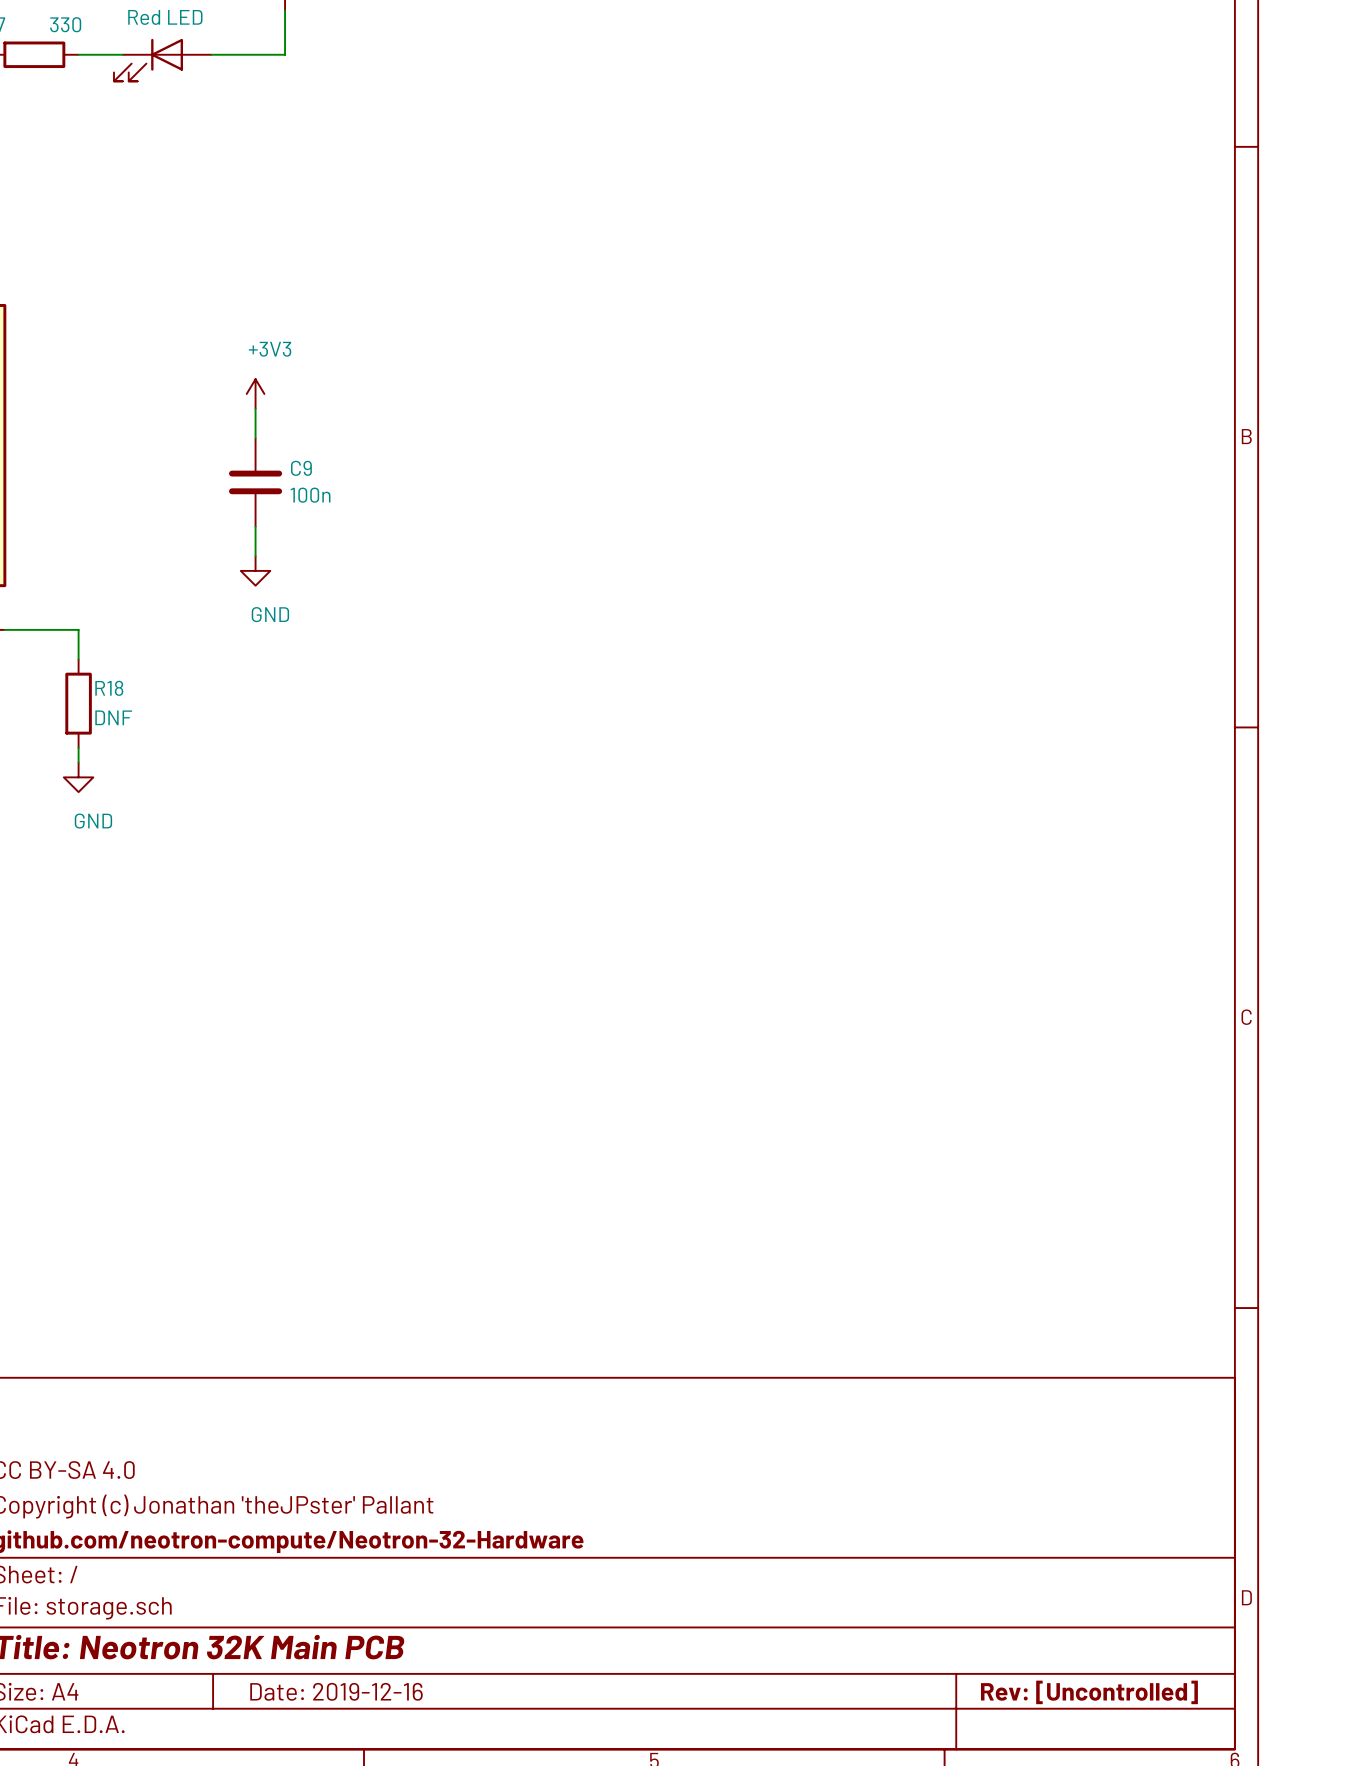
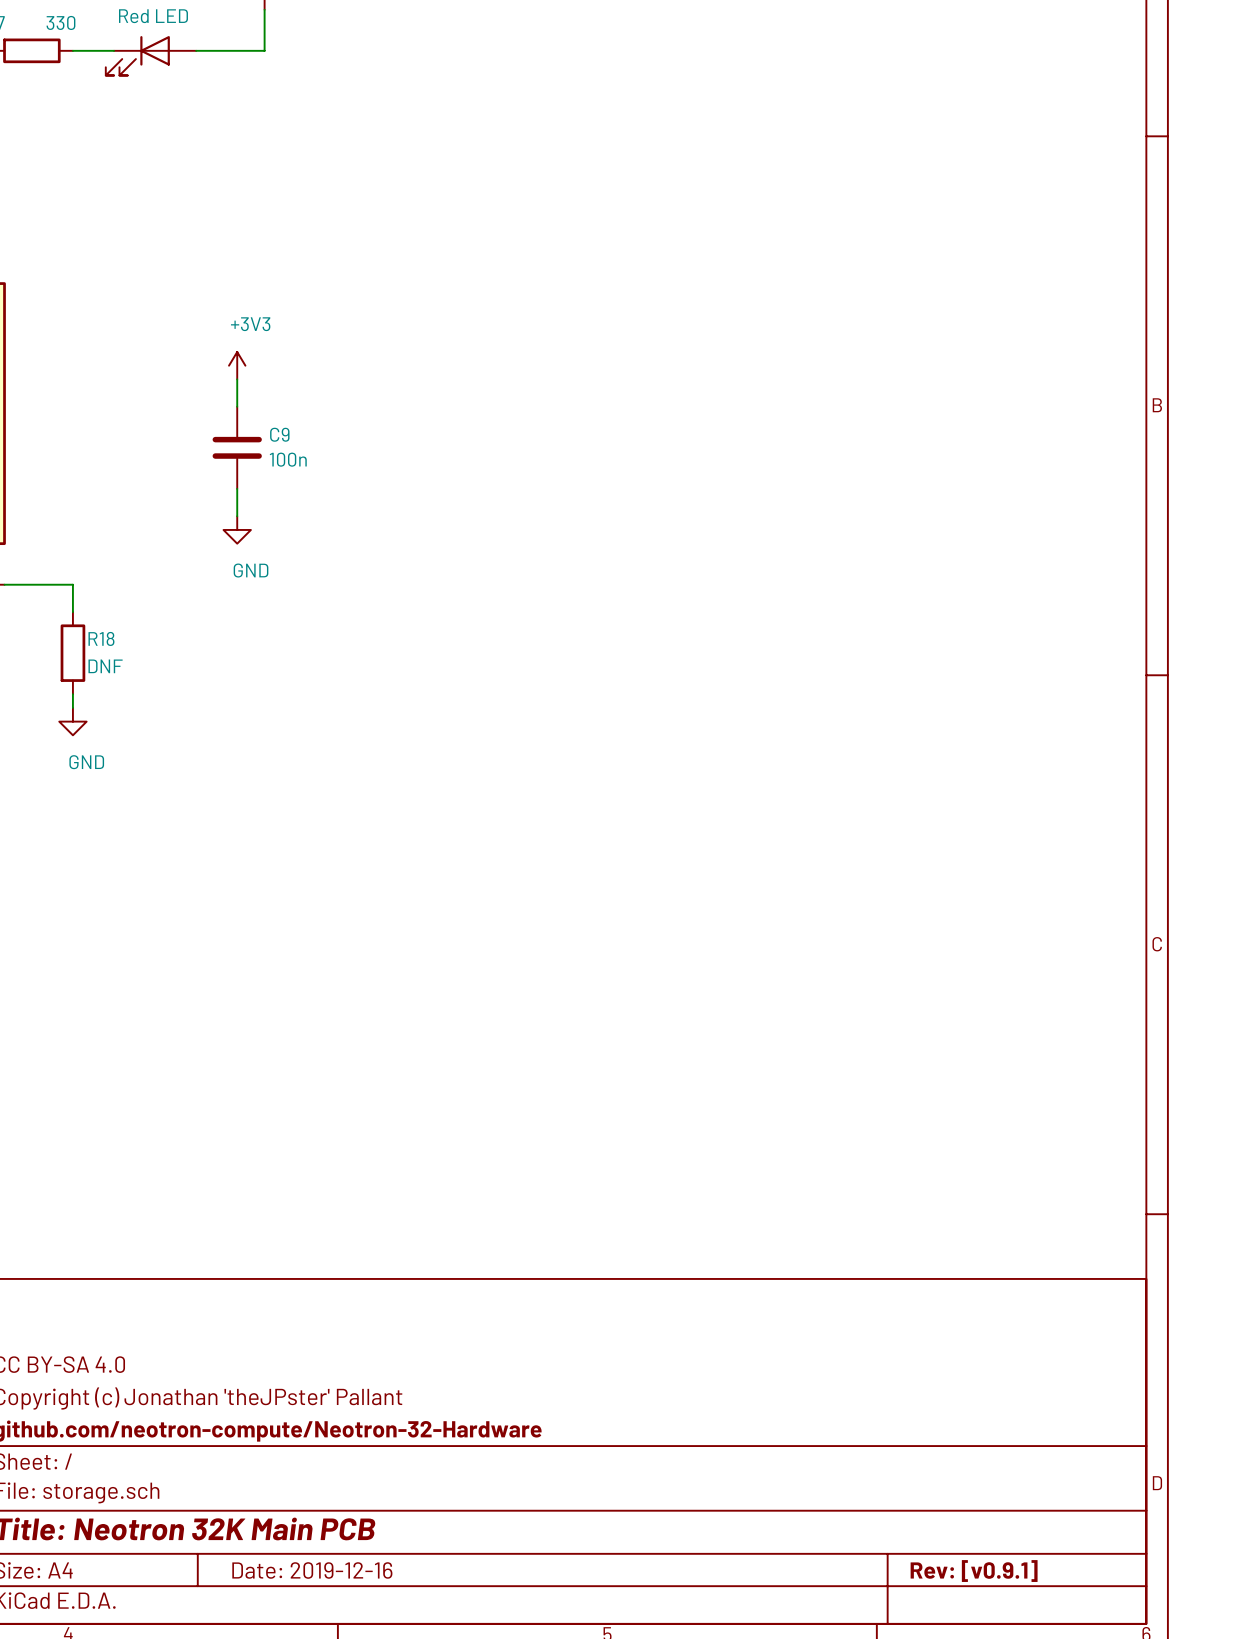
title block: Rev: [Uncontrolled] (1089, 1692) -> Rev: [v0.9.1] (974, 1571)

